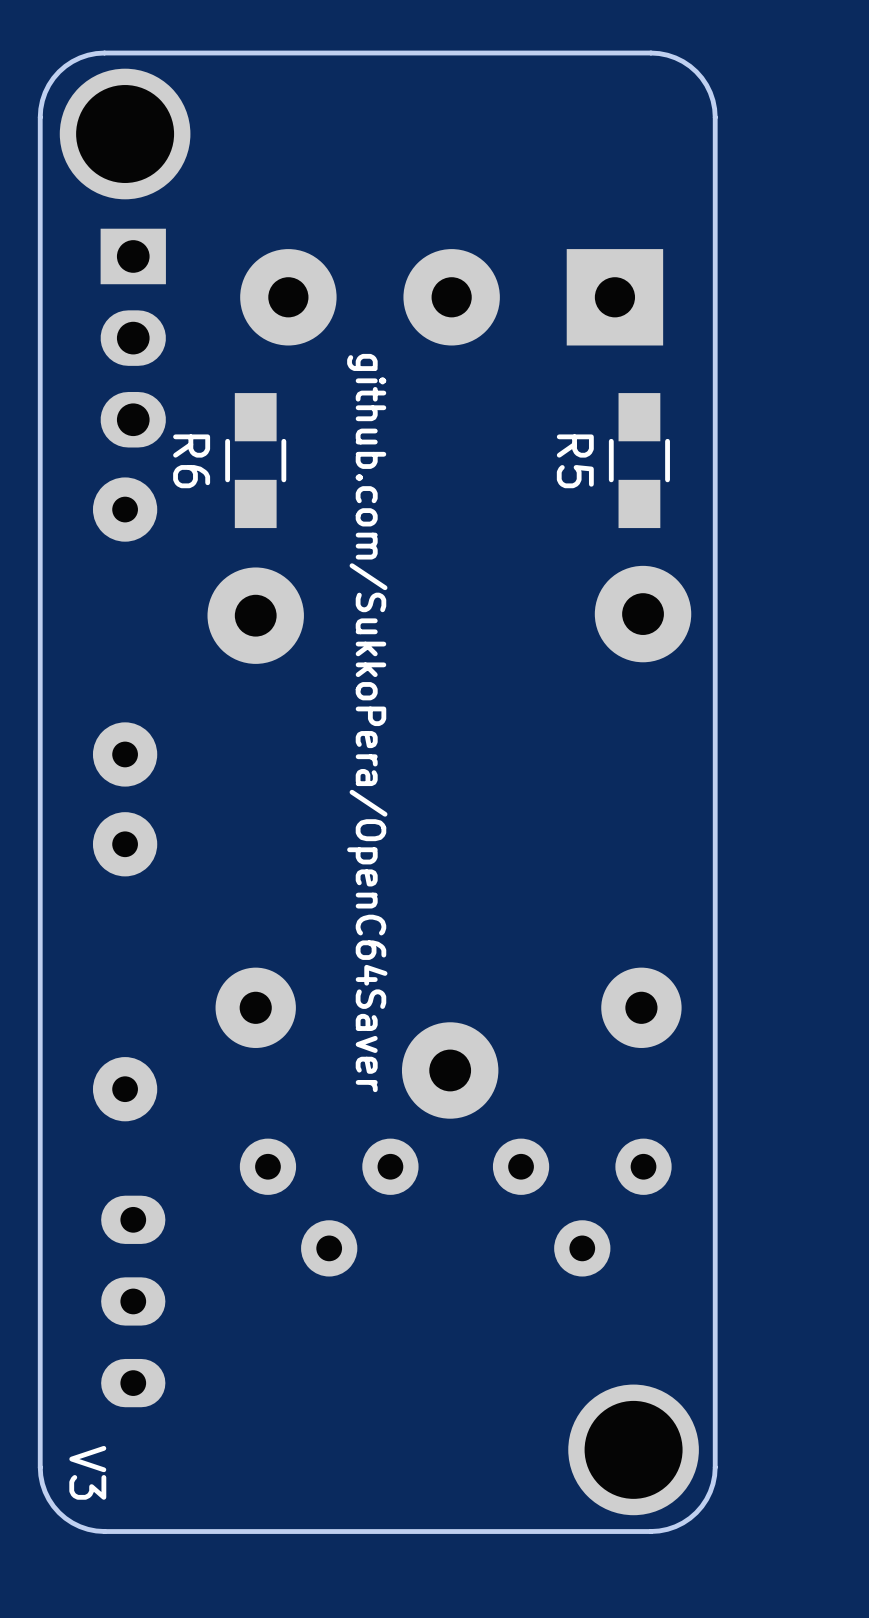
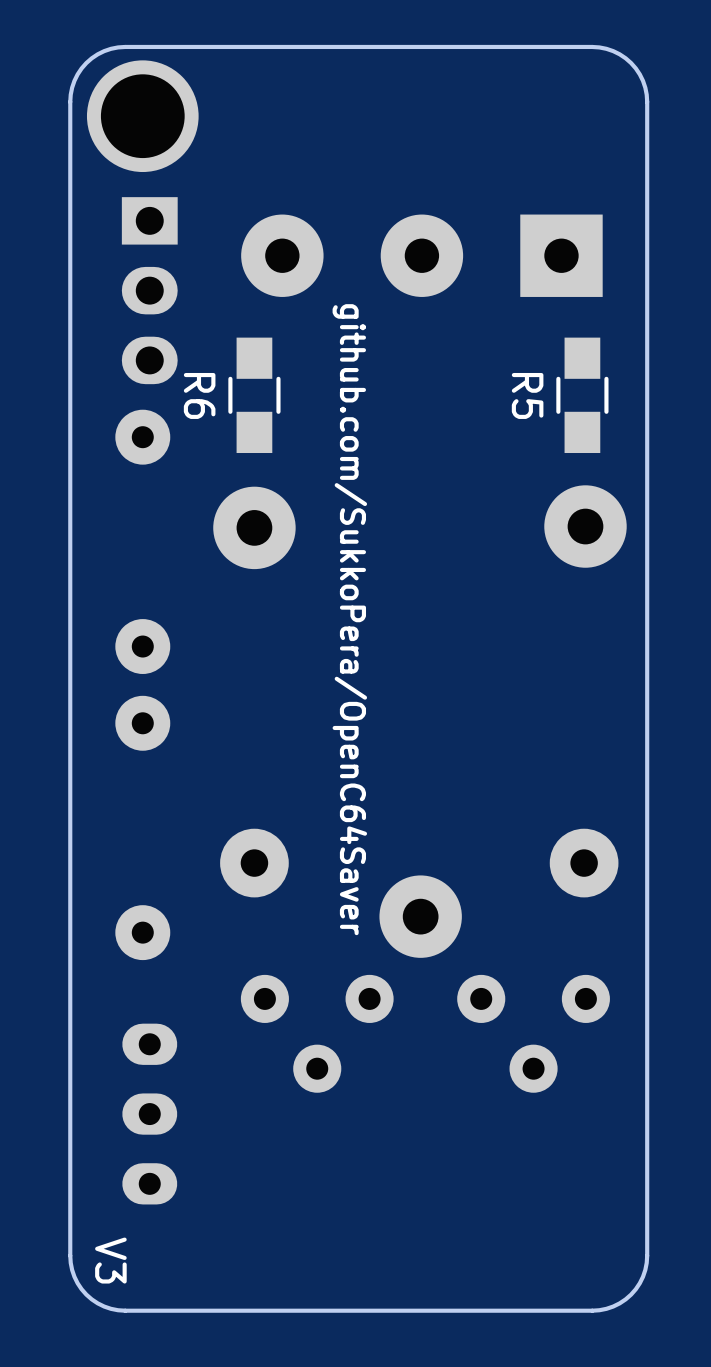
part: (633, 1449) -> none

